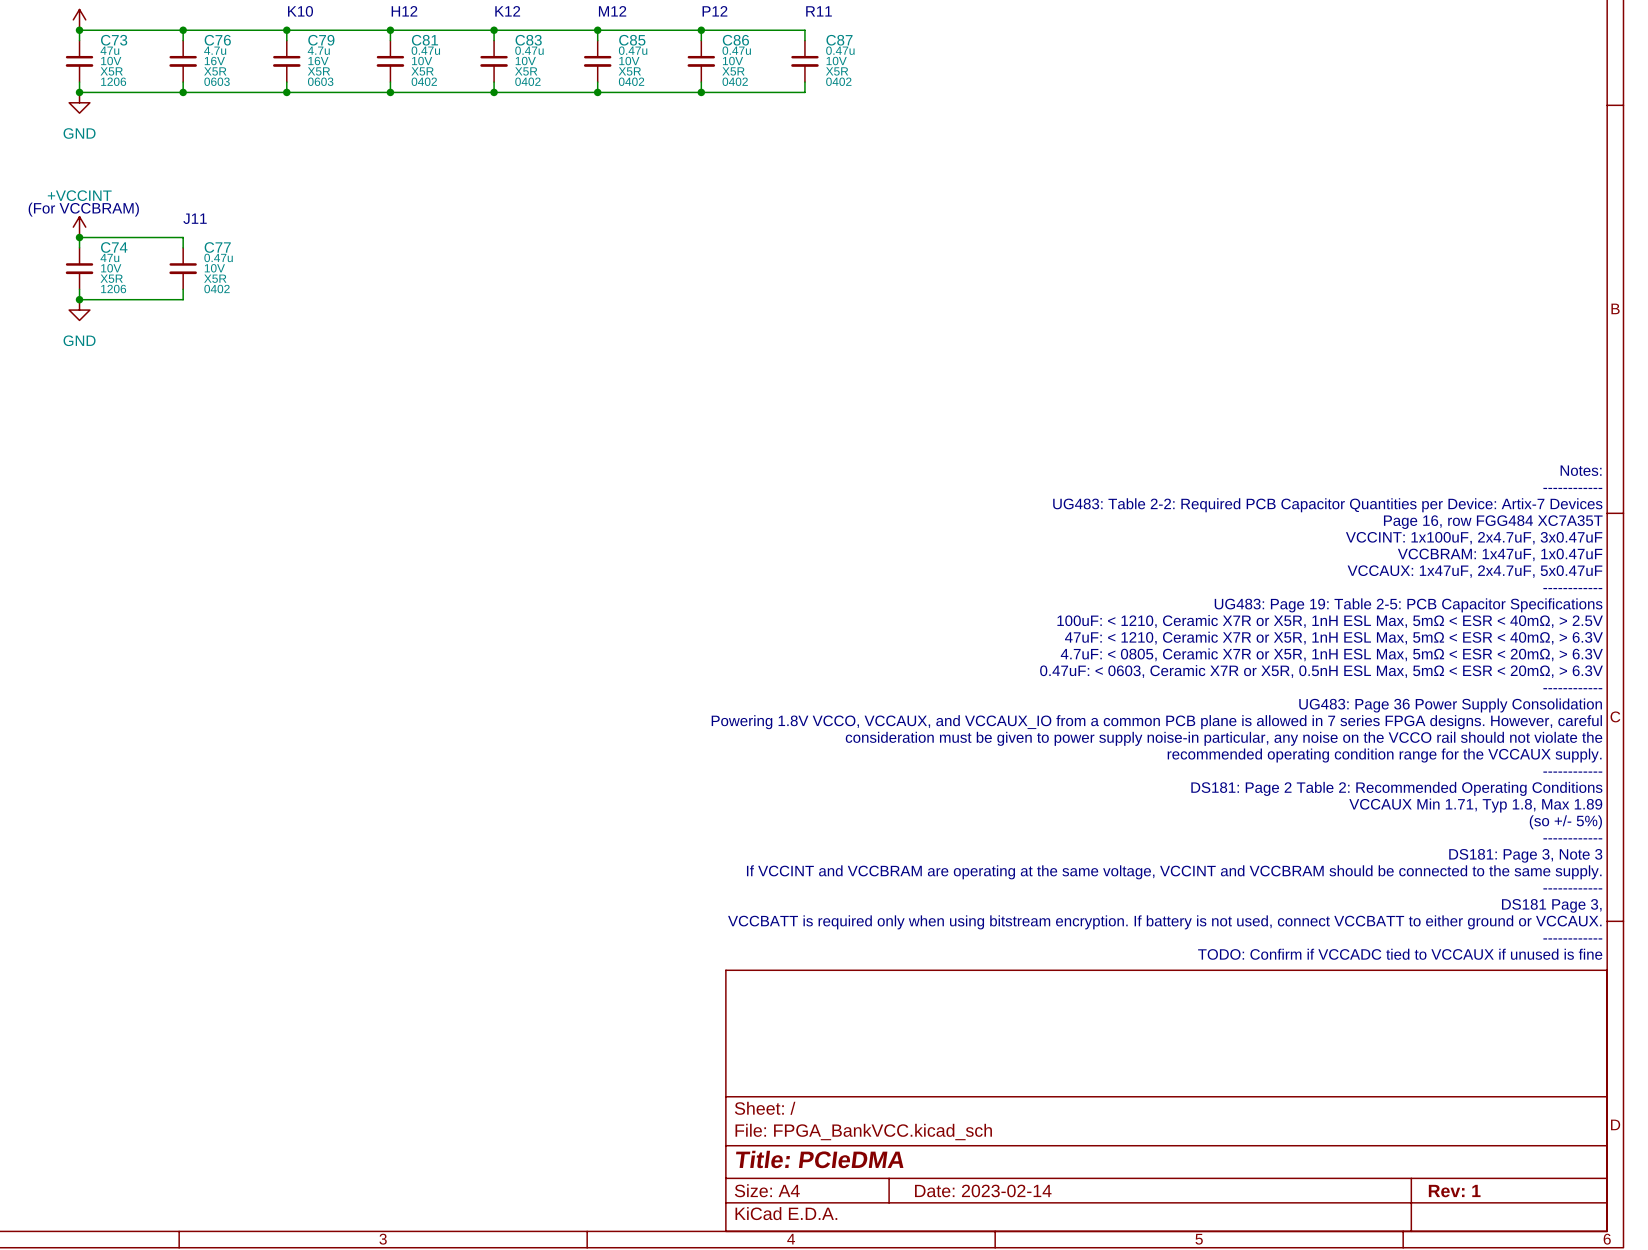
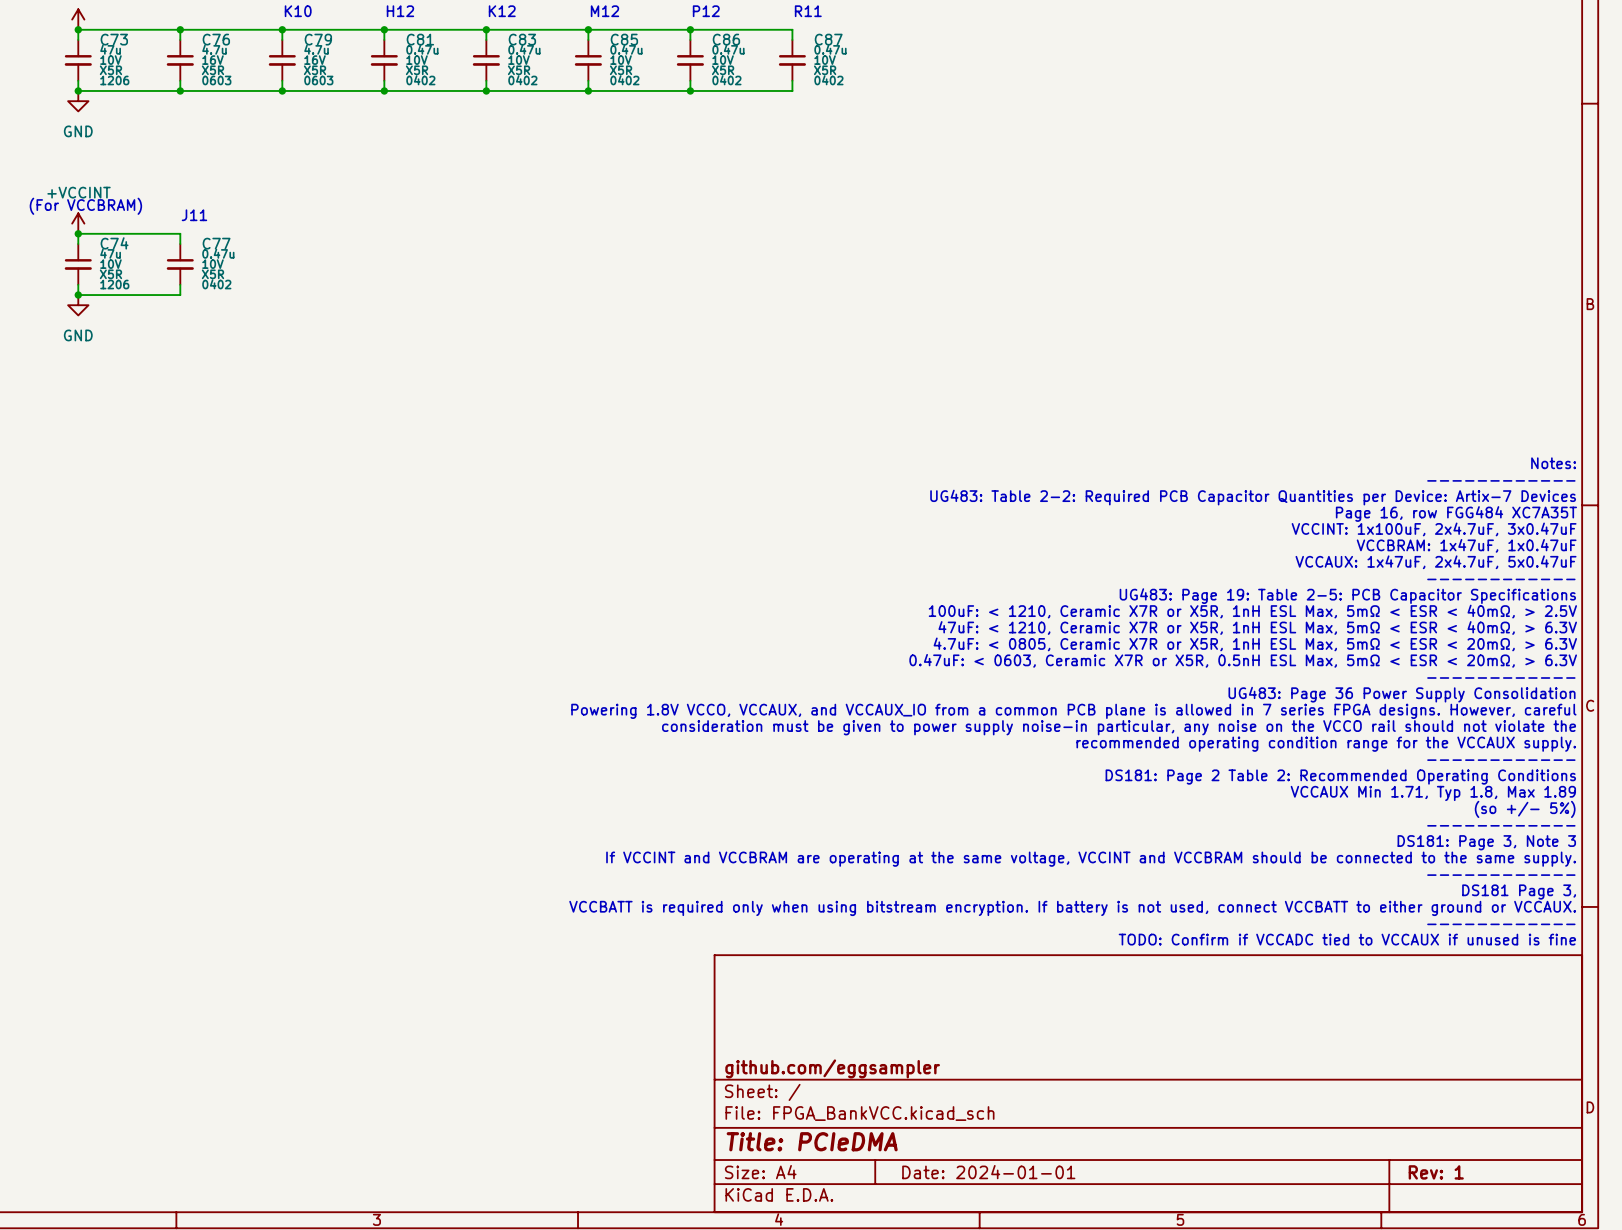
title block: none -> github.com/eggsampler (832, 1068)
title block: Date: 2023-02-14 (983, 1190) -> Date: 2024-01-01 (988, 1172)

